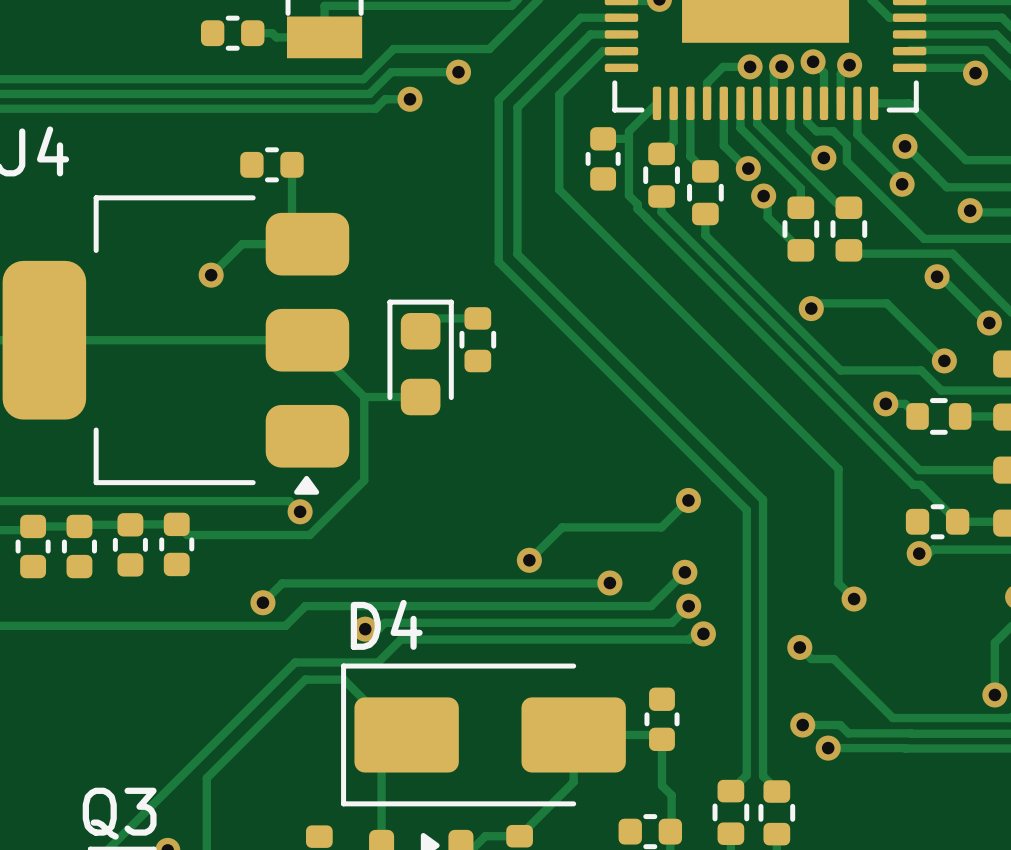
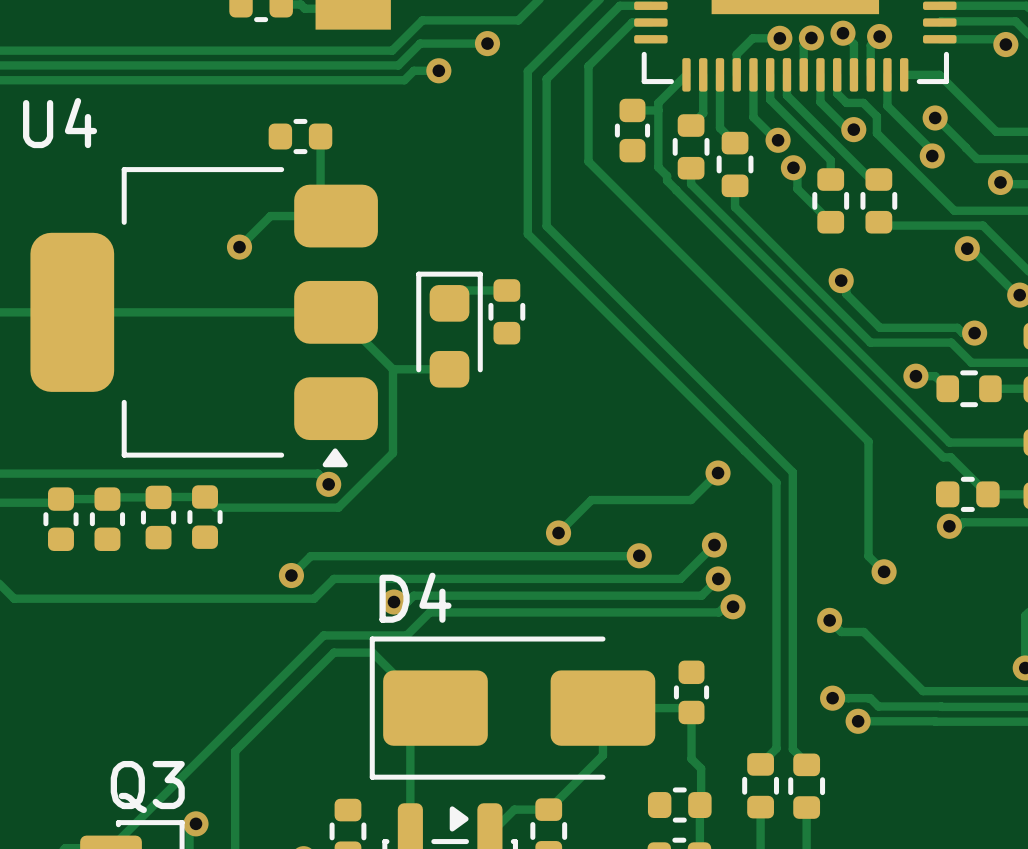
track: (816, 303) (886, 303) (944, 360) -> (846, 275) (846, 294) (879, 327) (957, 327) (962, 333) (974, 333)

